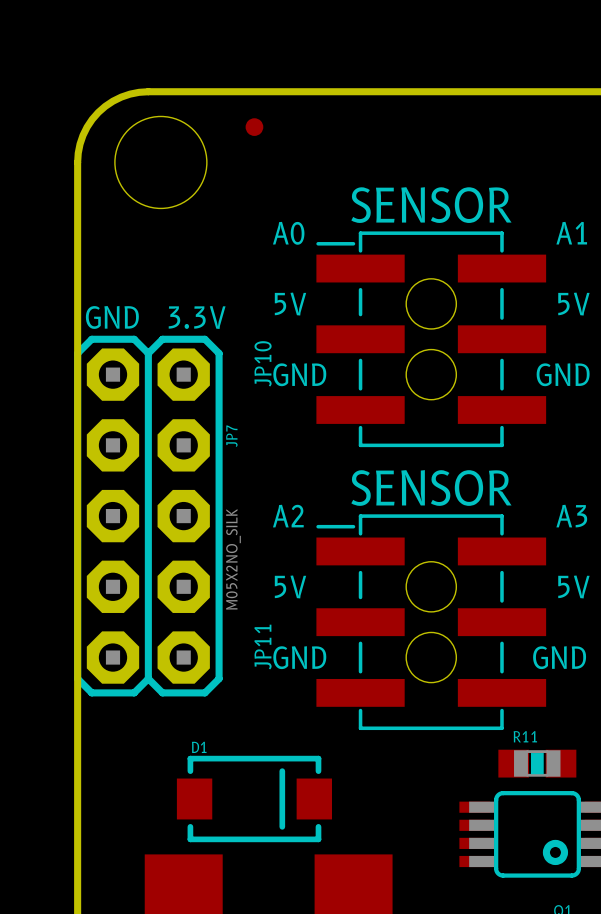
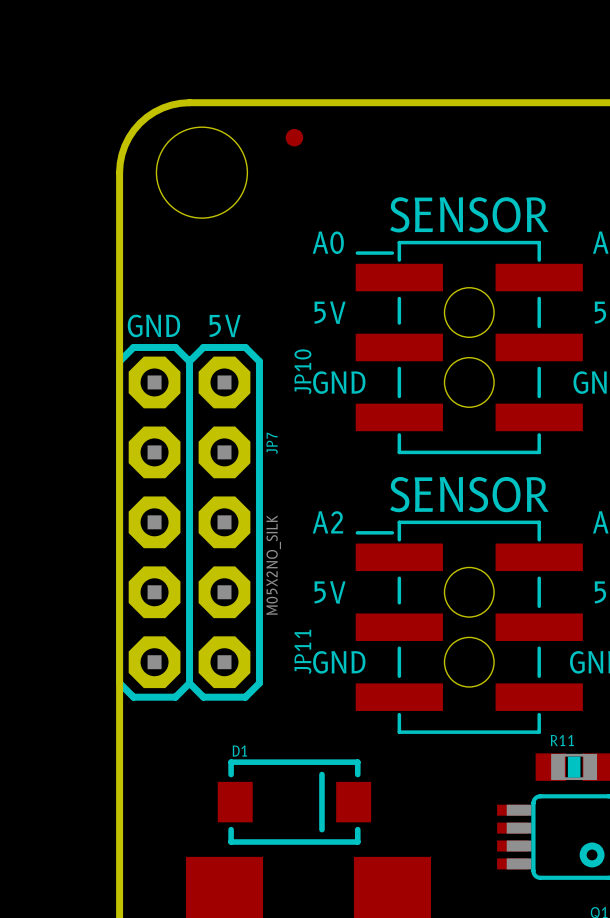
text: 3.3V (197, 317) -> 5V (225, 325)

